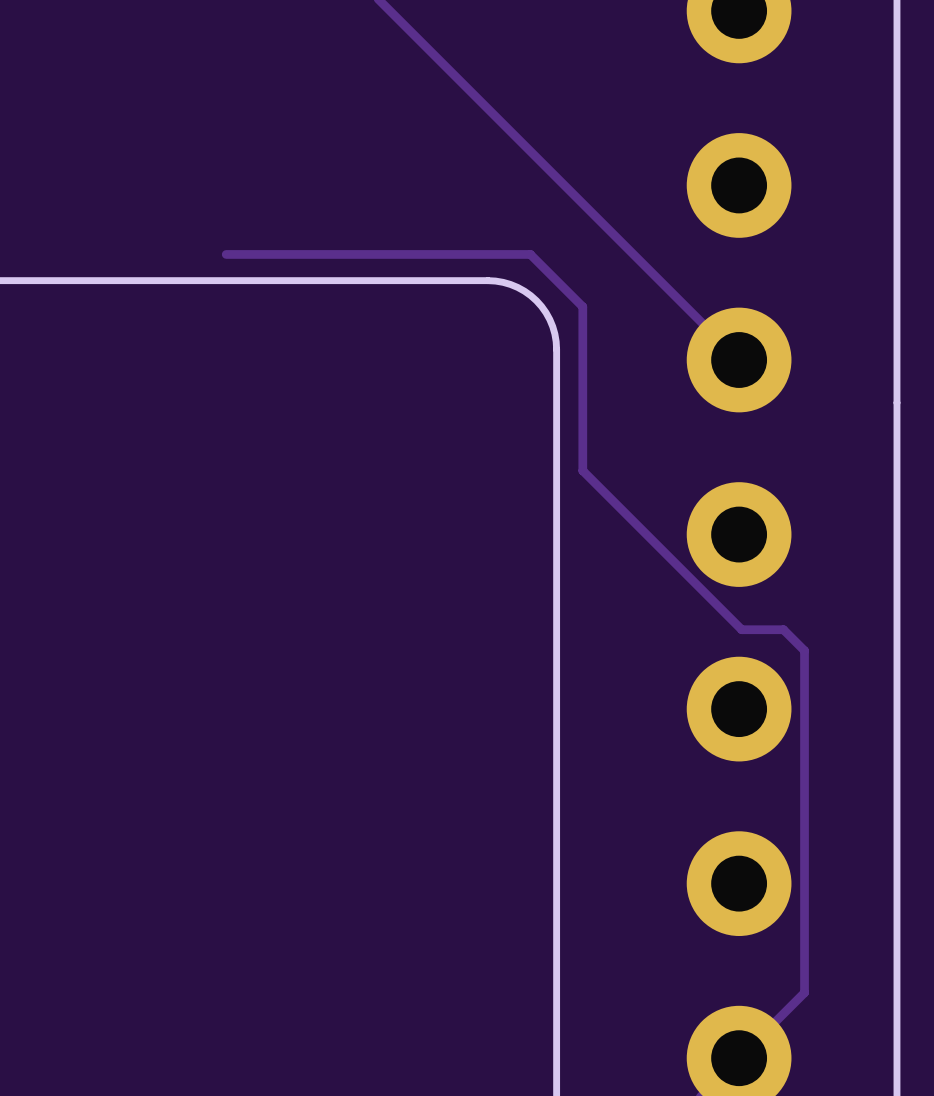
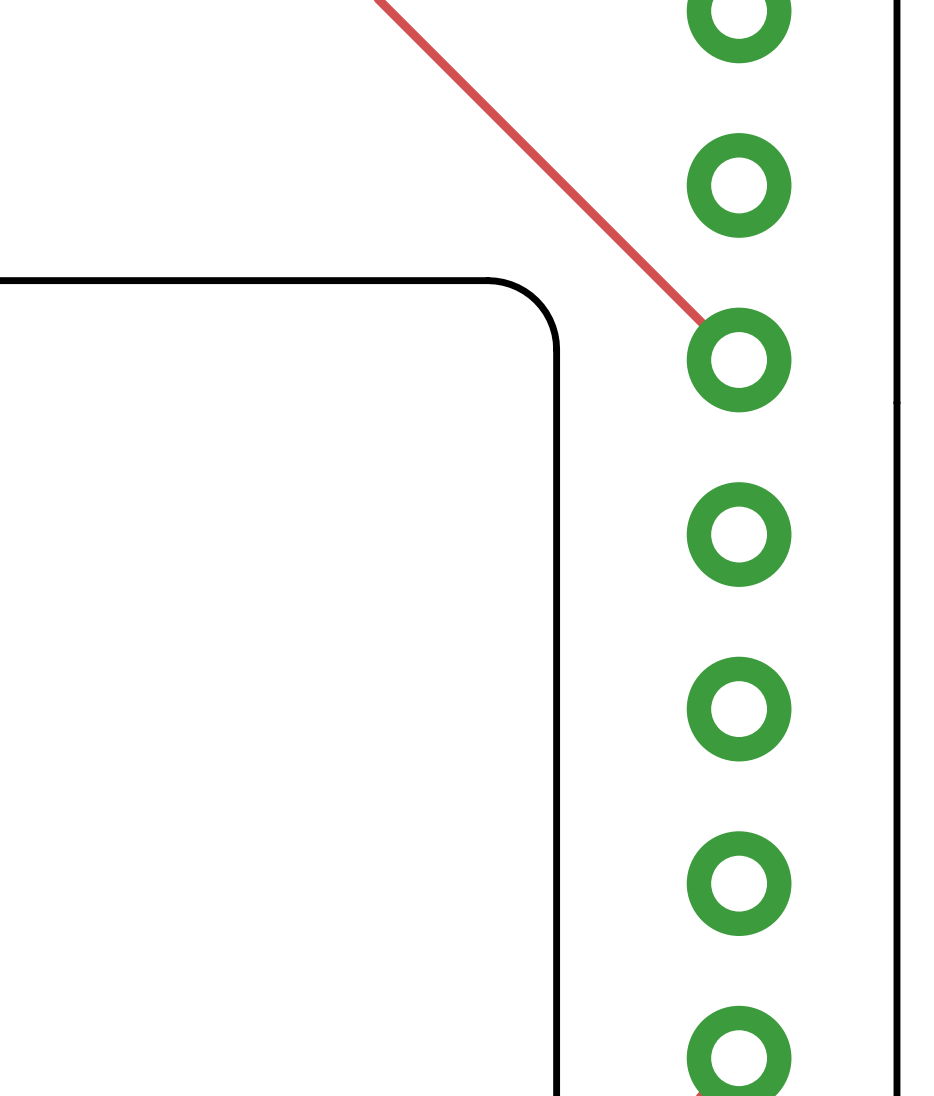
track: (226, 254) (530, 254) (582, 306) (582, 470) (741, 629) (783, 629) (804, 650) (804, 992) (739, 1058) -> none

